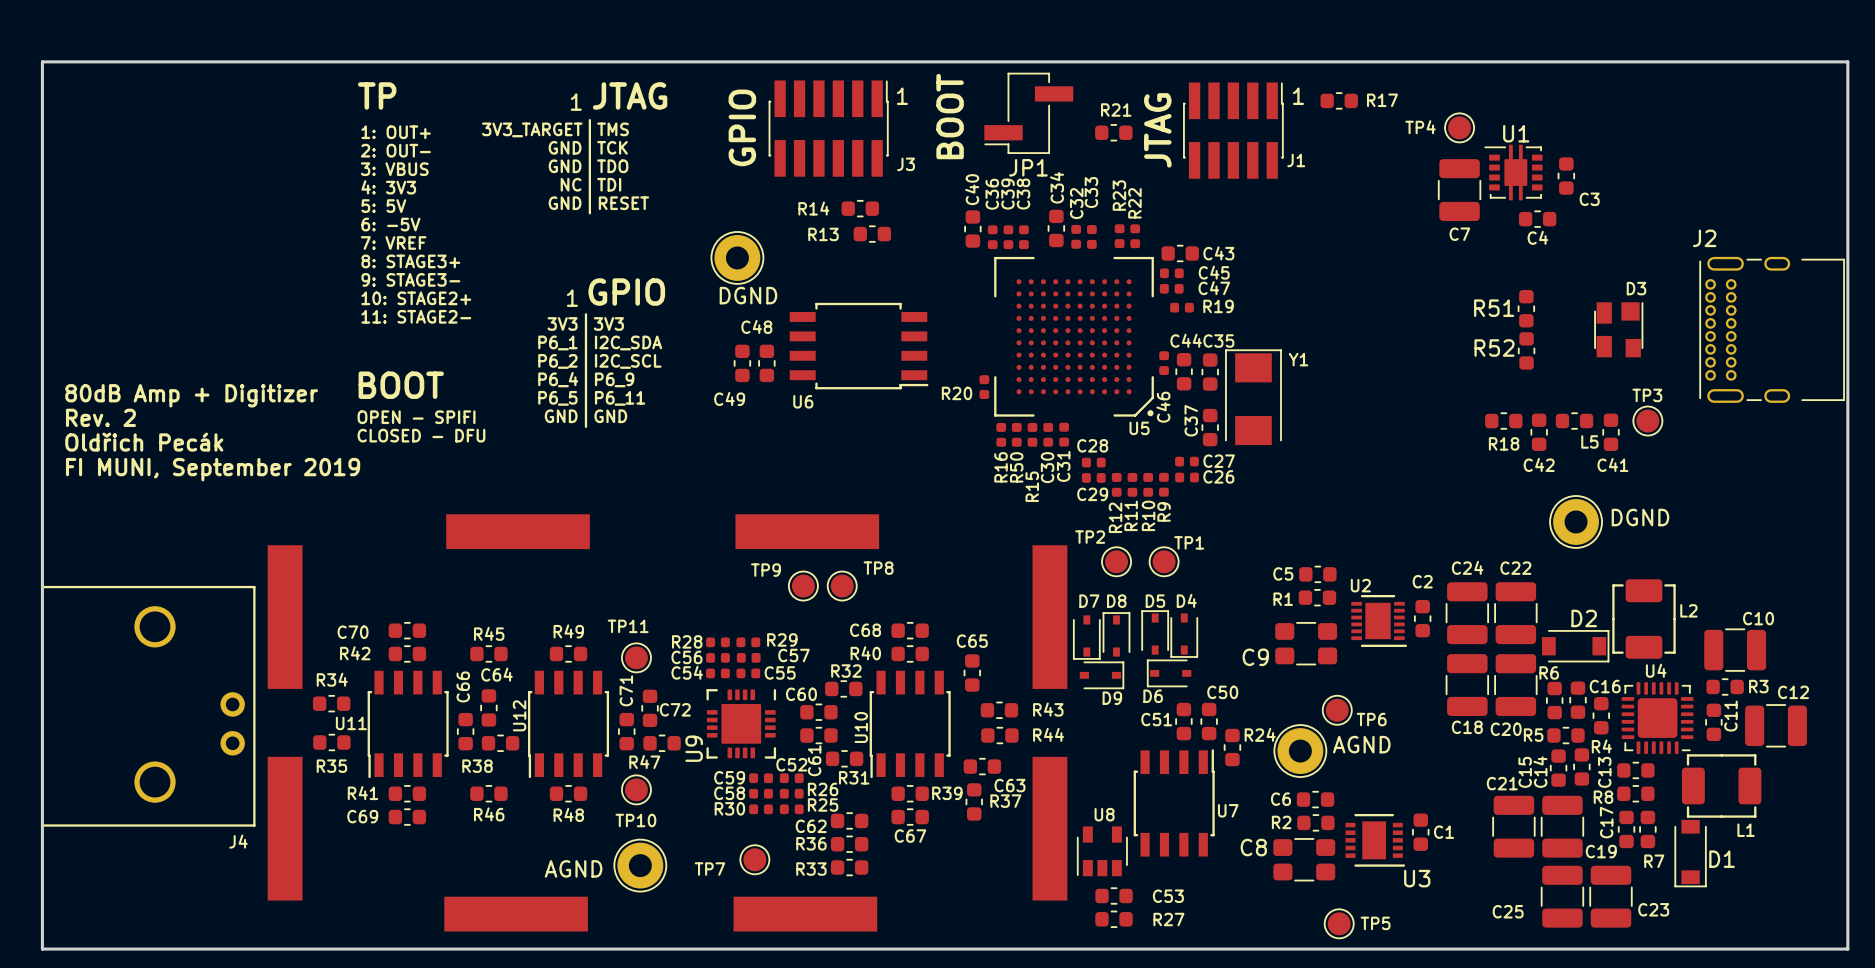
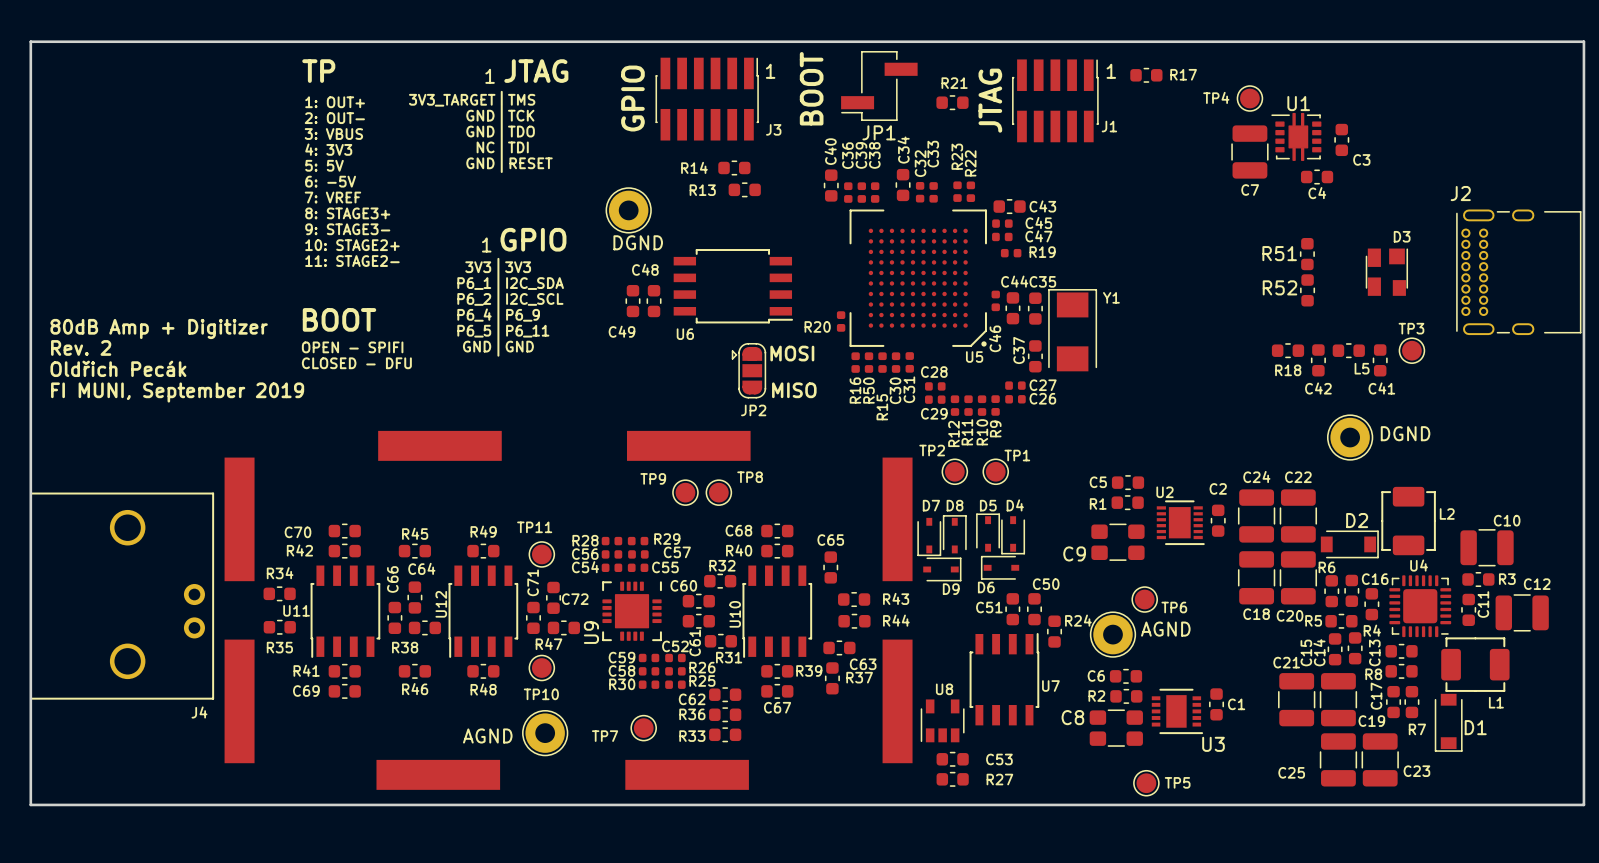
text: none -> MOSI (792, 353)
JP2: none -> (748, 370)
text: none -> MISO (794, 390)

